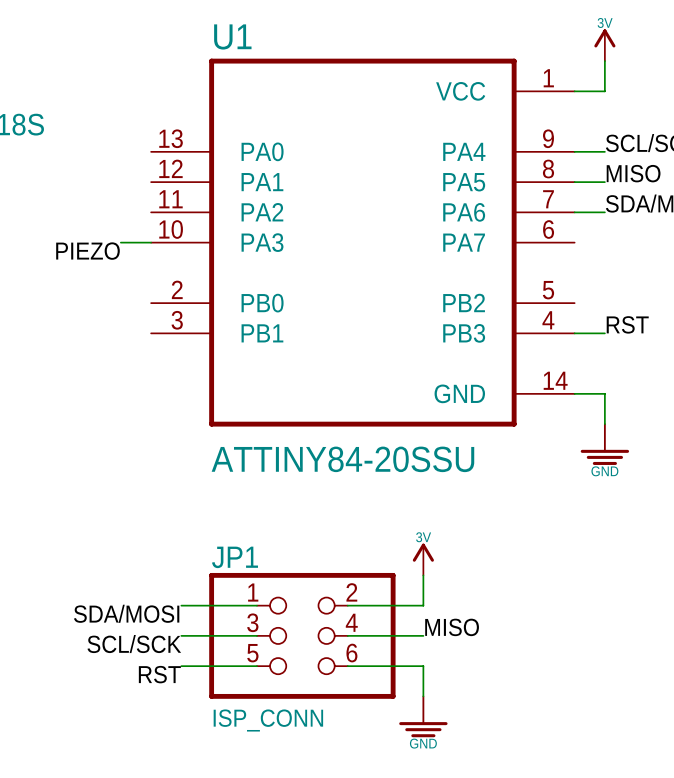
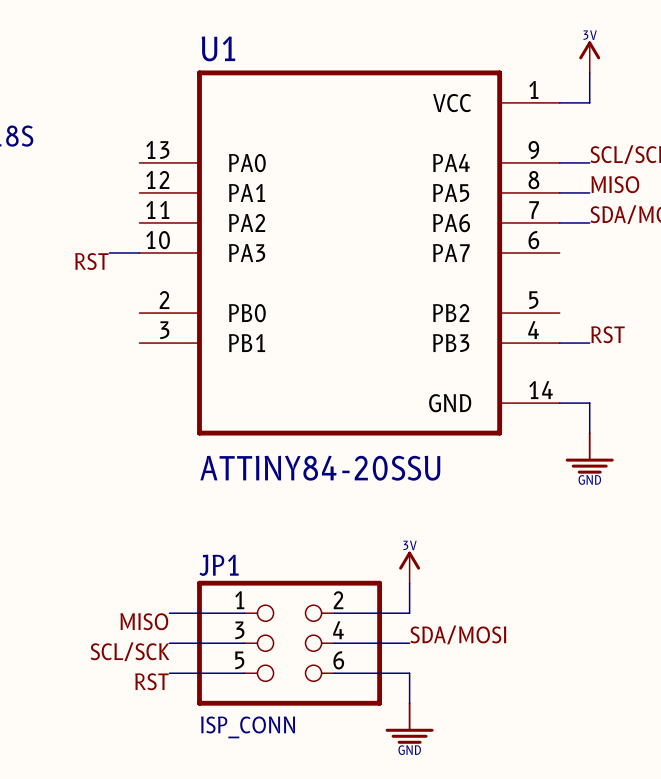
label: PIEZO (87, 251) -> RST (91, 261)
label: SDA/MOSI (126, 613) -> MISO (144, 621)
label: MISO (452, 627) -> SDA/MOSI (458, 634)

